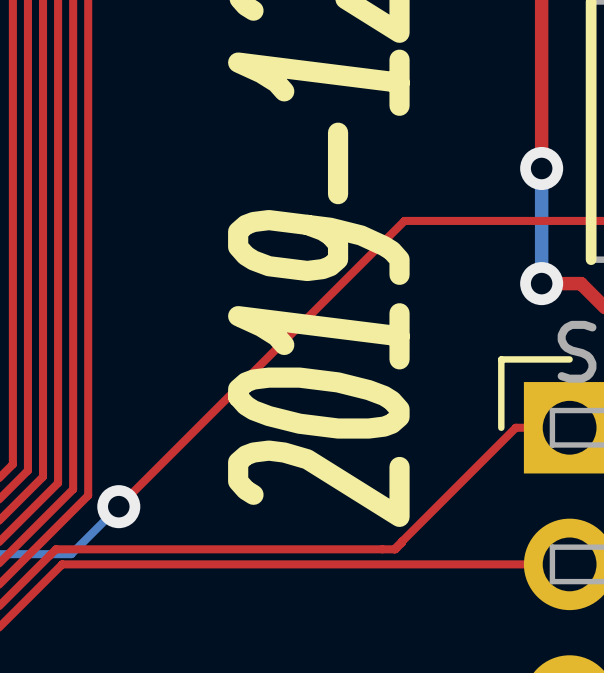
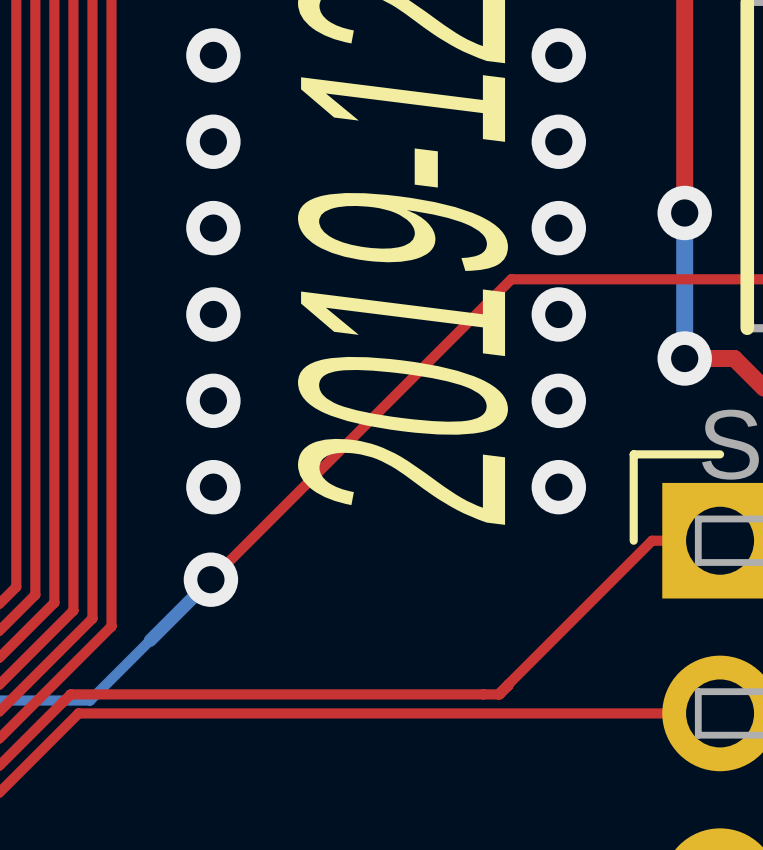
via: none -> (213, 55)
via: none -> (558, 55)
via: none -> (213, 141)
via: none -> (558, 141)
via: none -> (213, 228)
via: none -> (558, 228)
via: none -> (213, 314)
via: none -> (558, 314)
via: none -> (213, 400)
via: none -> (558, 400)
via: none -> (213, 487)
via: none -> (558, 487)
bottom track: none -> (210, 579) (150, 640)
top track: (166, 458) (118, 506) -> none
via: none -> (210, 579)
via: (118, 506) -> none

